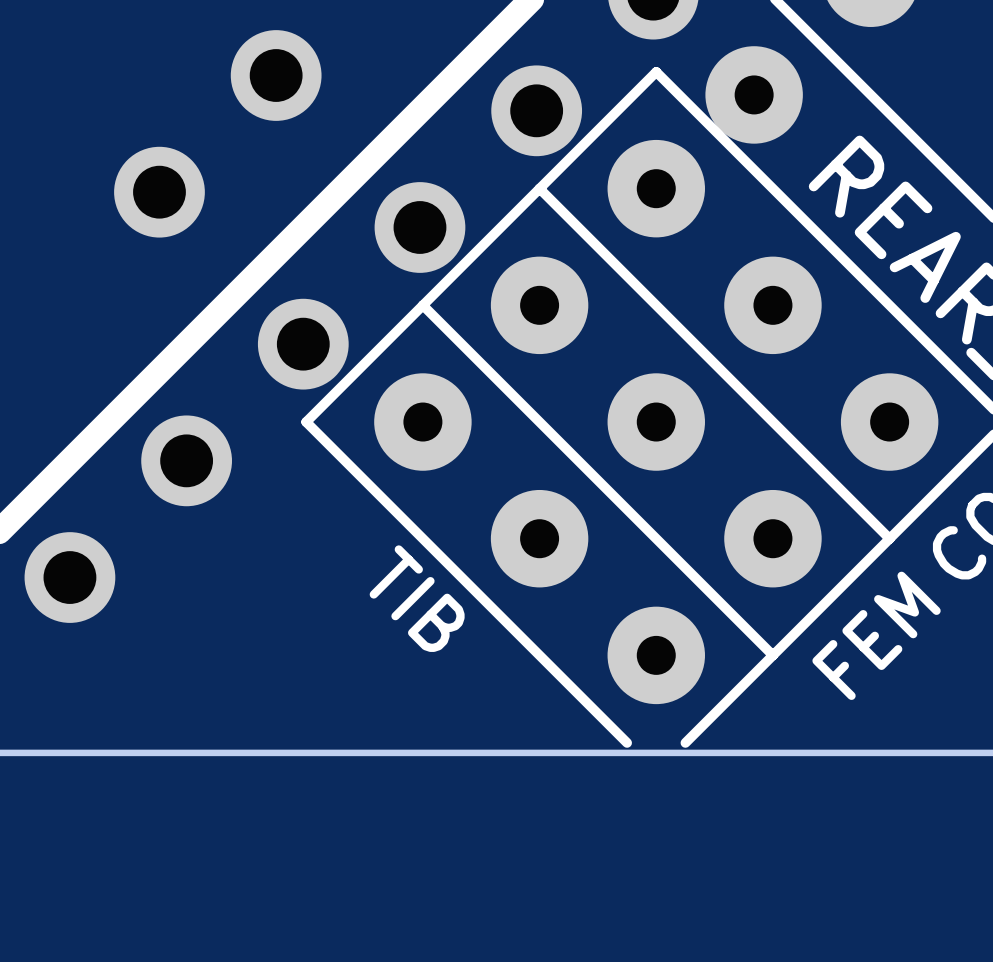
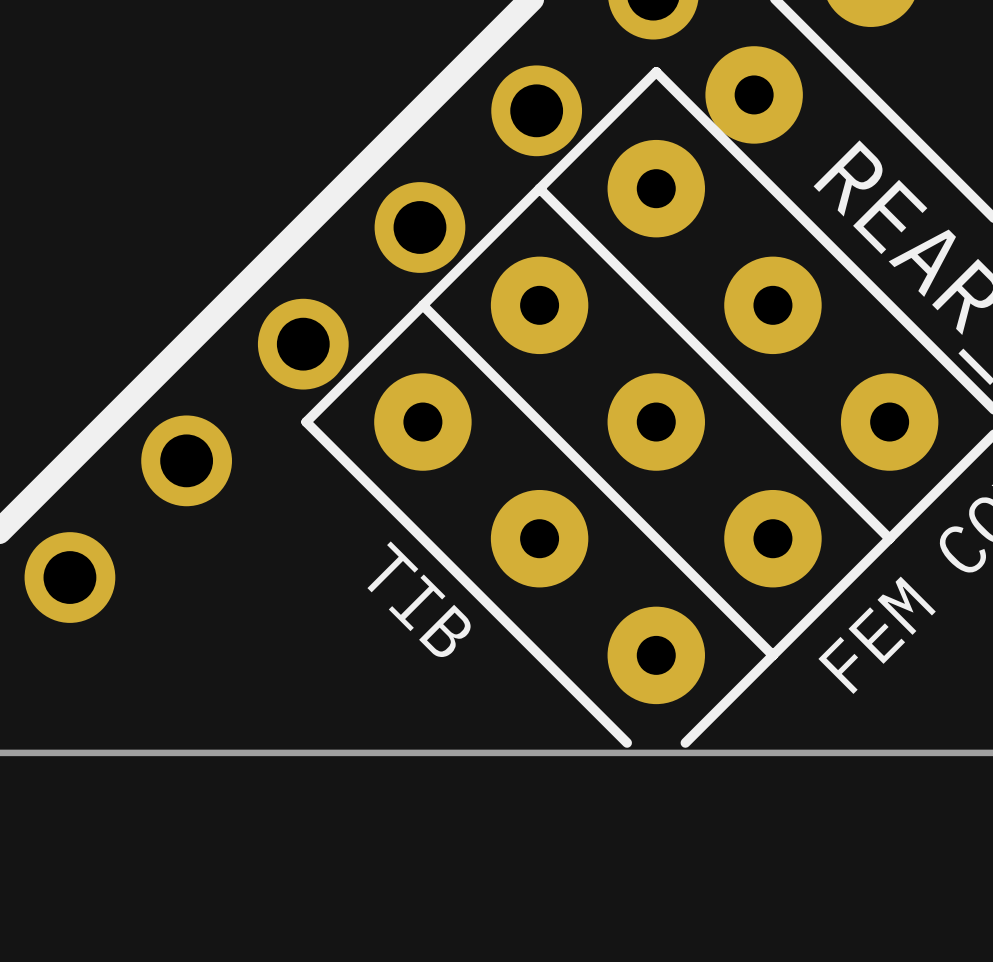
part: (217, 133) -> none

